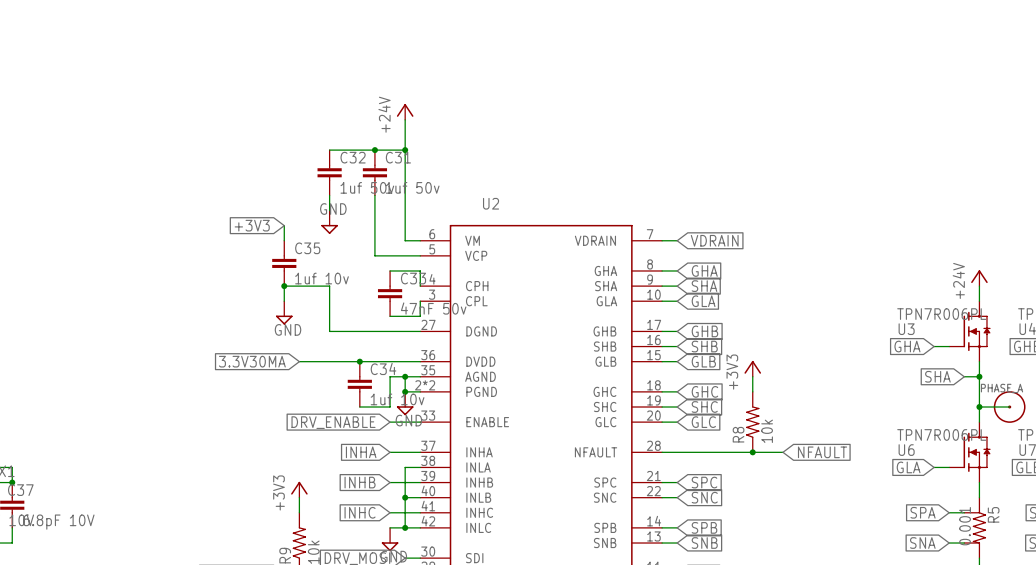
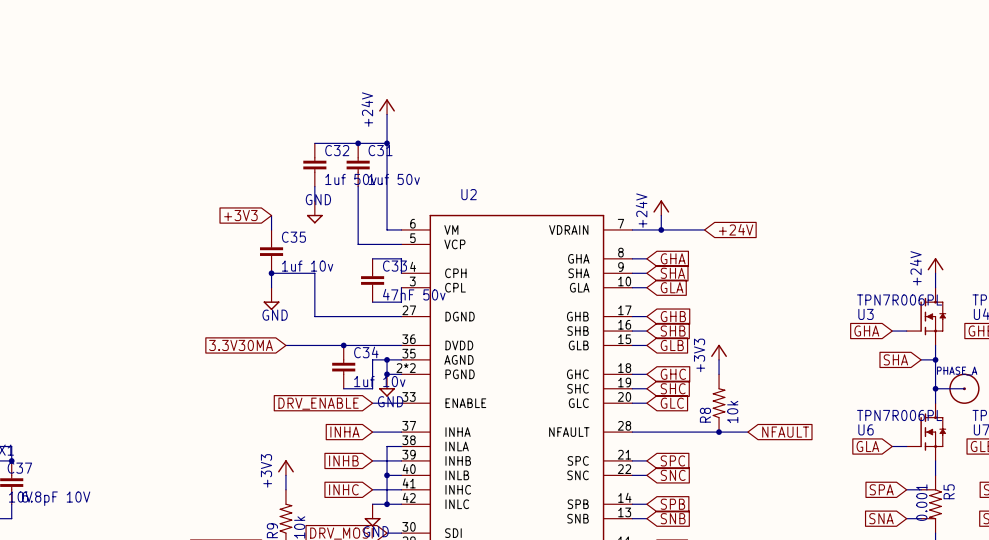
power symbol: none -> +24V (661, 207)
wire: none -> (661, 215) (661, 229)
wire: none -> (646, 229) (704, 229)
junction: none -> (661, 229)
global label: VDRAIN (714, 240) -> none
global label: none -> +24V (736, 229)

